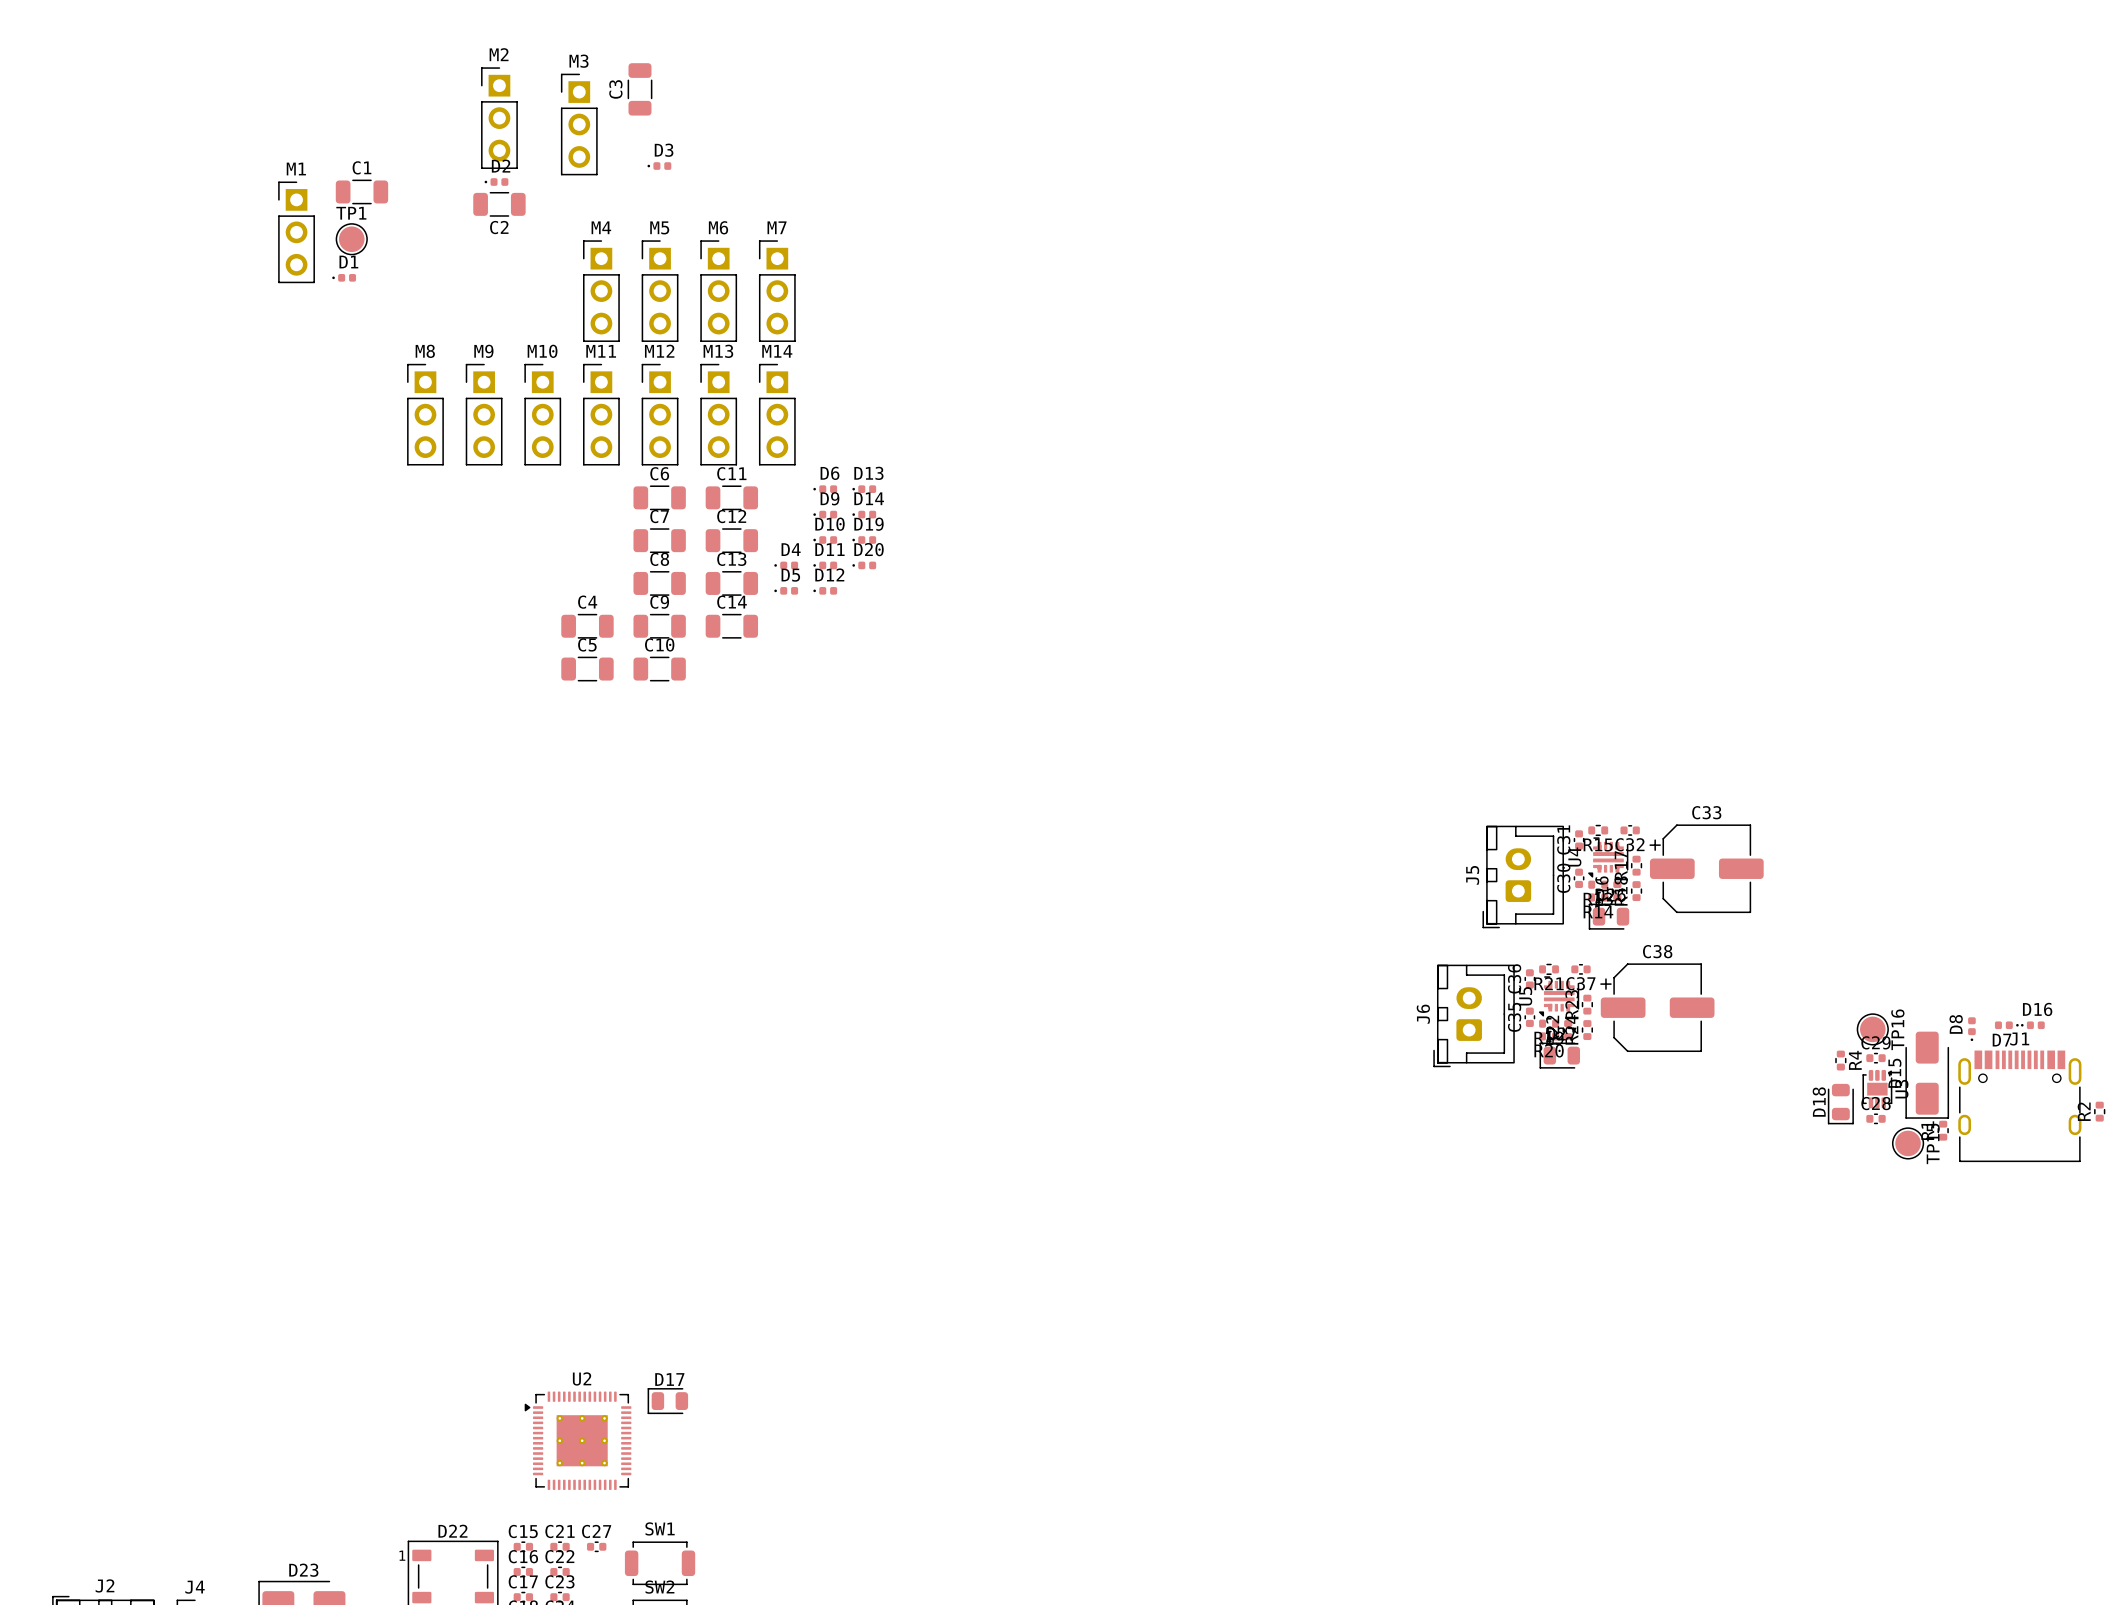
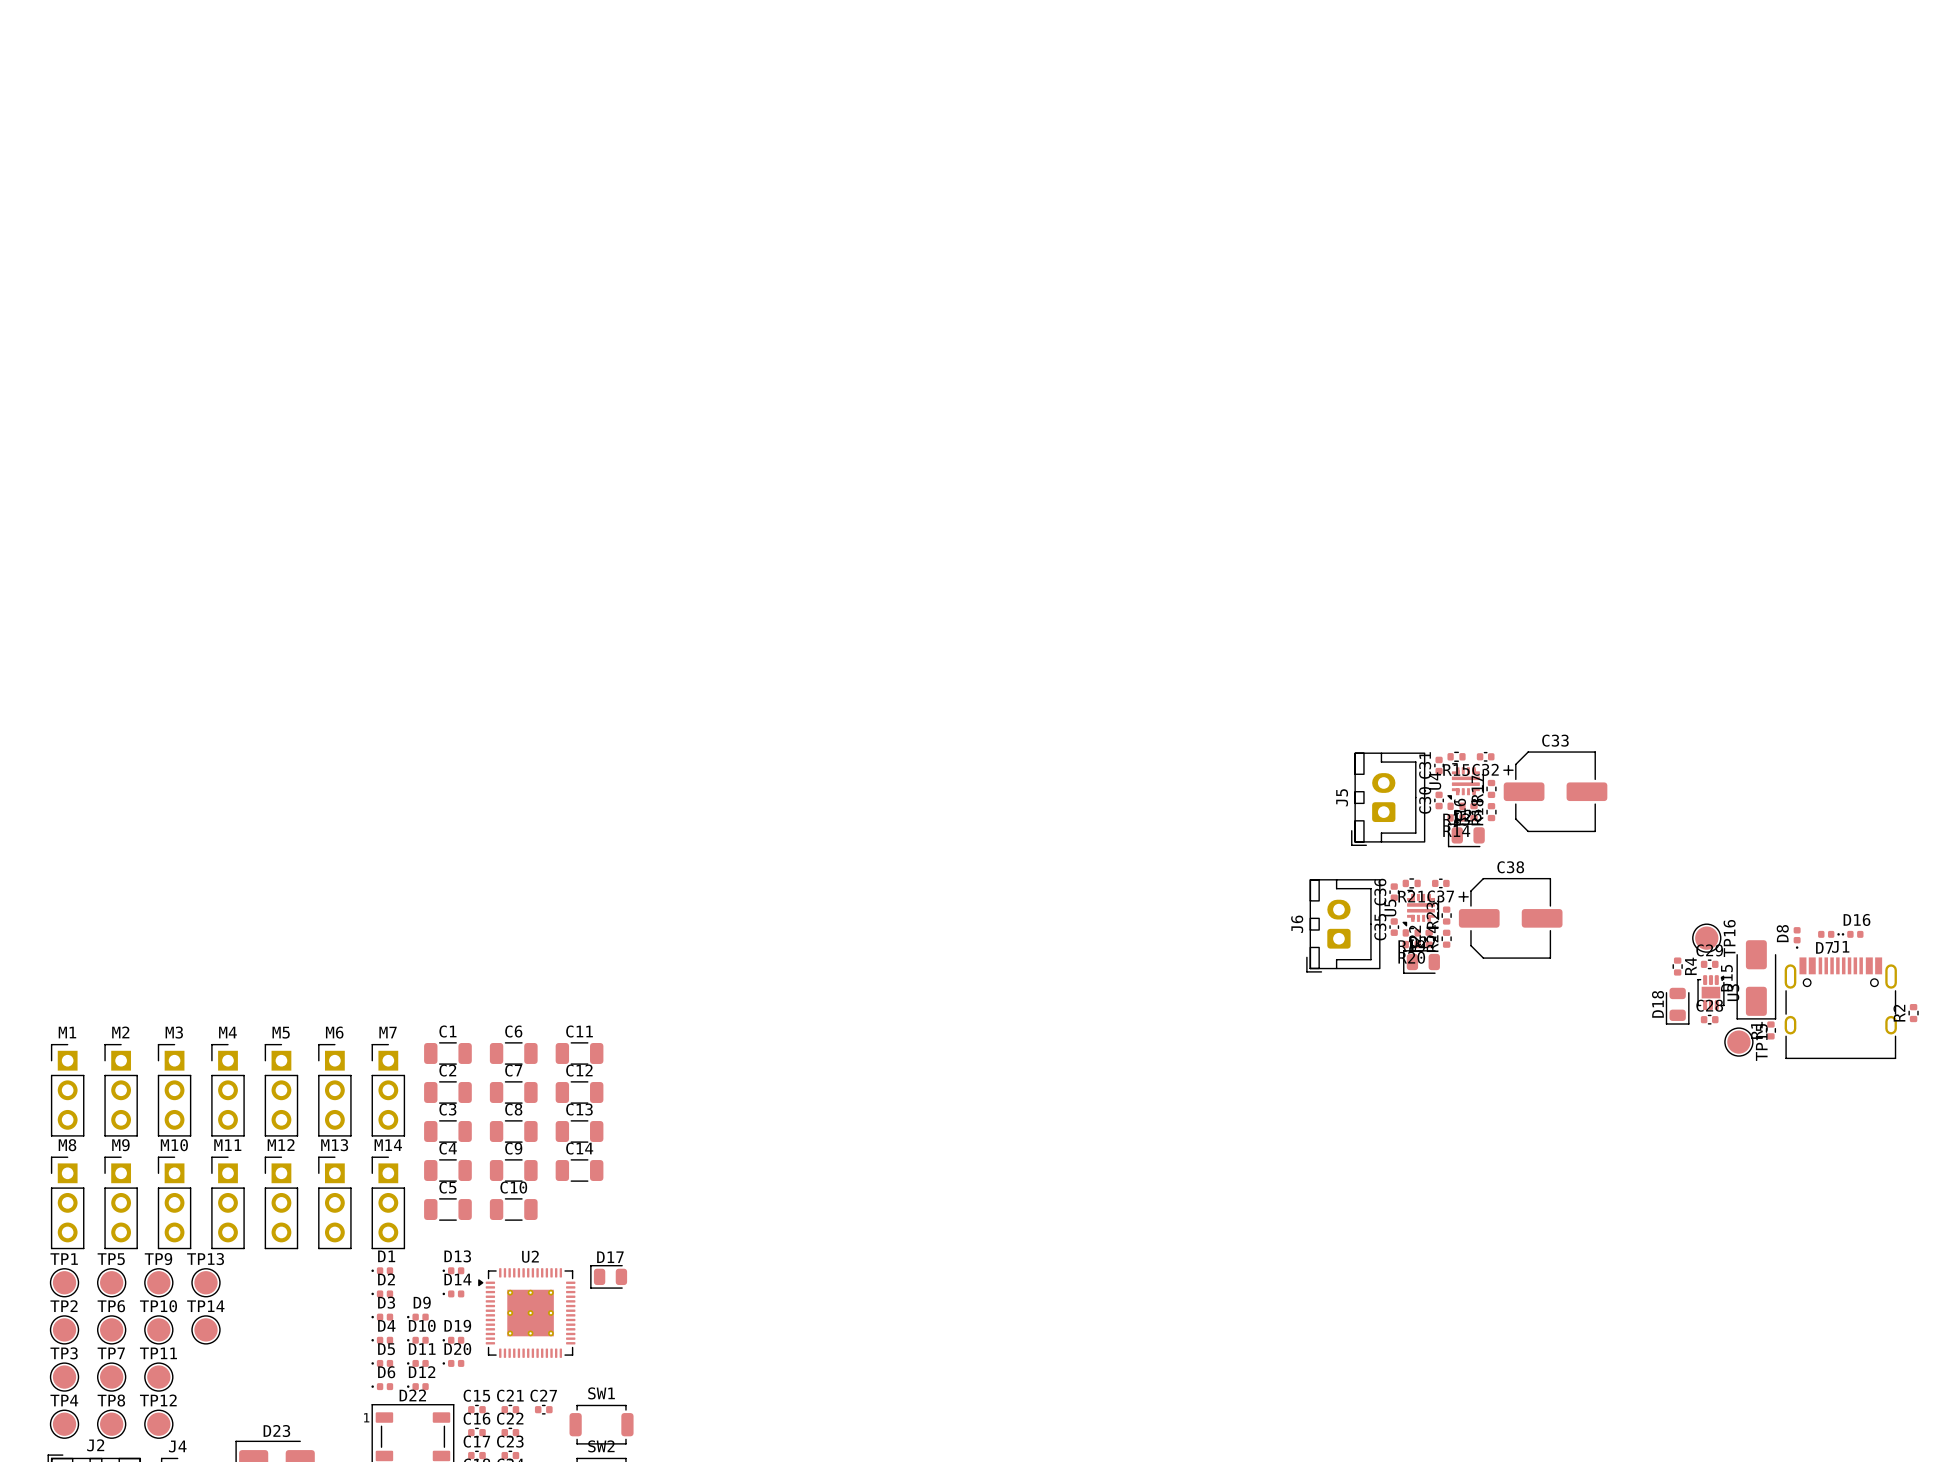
C3 rotation: 0° (639, 89) -> 90° clockwise (447, 1131)
C3 position: (639, 89) -> (447, 1131)
M2 position: (499, 118) -> (121, 1090)
M3 position: (579, 124) -> (174, 1090)
D3 position: (659, 166) -> (382, 1317)
D2 position: (496, 182) -> (382, 1293)
C1 position: (361, 191) -> (447, 1053)
C2 position: (499, 204) -> (447, 1092)
C2 name position: C2 (499, 227) -> C2 (447, 1070)
M1 position: (296, 232) -> (67, 1090)
TP1 position: (351, 239) -> (64, 1282)
D1 position: (344, 277) -> (382, 1270)
M4 position: (601, 291) -> (228, 1090)
M5 position: (660, 291) -> (281, 1090)
M6 position: (718, 291) -> (334, 1090)
M7 position: (777, 291) -> (388, 1090)
M8 position: (425, 414) -> (67, 1202)
M9 position: (484, 414) -> (121, 1202)
M10 position: (542, 414) -> (174, 1202)
M11 position: (601, 414) -> (228, 1202)
M12 position: (660, 414) -> (281, 1202)
M13 position: (718, 414) -> (334, 1202)
M14 position: (777, 414) -> (388, 1202)
D6 position: (825, 489) -> (382, 1386)
D13 position: (864, 489) -> (453, 1270)
C6 position: (659, 497) -> (513, 1053)
C11 position: (731, 497) -> (579, 1053)
D9 position: (825, 514) -> (417, 1317)
D14 position: (864, 514) -> (453, 1293)
C7 position: (659, 540) -> (513, 1092)
C12 position: (731, 540) -> (579, 1092)
D10 position: (825, 540) -> (417, 1340)
D19 position: (864, 540) -> (453, 1340)
D4 position: (786, 565) -> (382, 1340)
D11 position: (825, 565) -> (417, 1363)
D20 position: (864, 565) -> (453, 1363)
C8 position: (659, 583) -> (513, 1131)
C13 position: (731, 583) -> (579, 1131)
D5 position: (786, 590) -> (382, 1363)
D12 position: (825, 590) -> (417, 1386)
C4 position: (587, 626) -> (447, 1170)
C9 position: (659, 626) -> (513, 1170)
C14 position: (731, 626) -> (579, 1170)
C5 position: (587, 669) -> (447, 1209)
C10 position: (659, 669) -> (513, 1209)
TP5: none -> (111, 1282)
TP9: none -> (158, 1282)
TP13: none -> (205, 1282)
TP2: none -> (64, 1329)
TP6: none -> (111, 1329)
TP10: none -> (158, 1329)
TP14: none -> (205, 1329)
TP3: none -> (64, 1377)
TP7: none -> (111, 1377)
TP11: none -> (158, 1377)
TP4: none -> (64, 1424)
TP8: none -> (111, 1424)
TP12: none -> (158, 1424)

